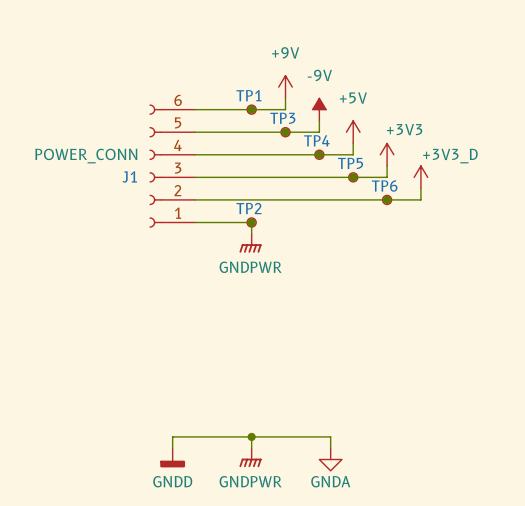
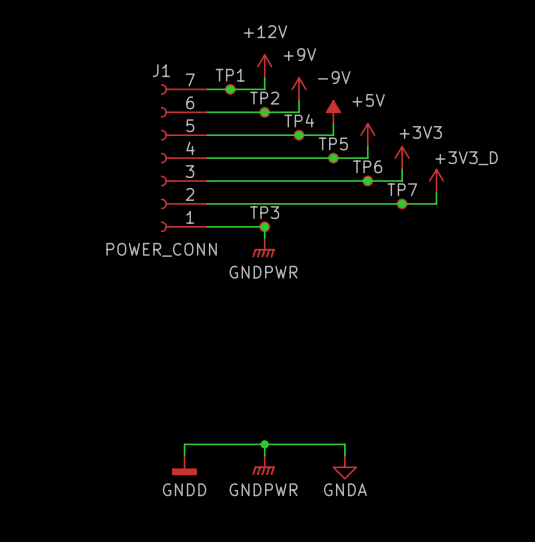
power symbol: none -> +12V (264, 66)
wire: none -> (264, 77) (264, 89) (207, 89)
TP1: none -> (230, 89)
junction: none -> (230, 89)
TP1 name: TP1 (248, 95) -> TP2 (264, 98)
J1 symbol: [149, 104, 196, 228] -> [160, 84, 208, 233]
TP3 name: TP3 (282, 118) -> TP4 (299, 120)
TP4 name: TP4 (316, 140) -> TP5 (333, 143)
J1 value position: POWER_CONN (86, 156) -> POWER_CONN (161, 249)
TP5 name: TP5 (350, 163) -> TP6 (367, 166)
J1 name position: J1 (129, 177) -> J1 (161, 70)
TP6 name: TP6 (384, 186) -> TP7 (402, 189)
TP2 name: TP2 (248, 208) -> TP3 (264, 212)

